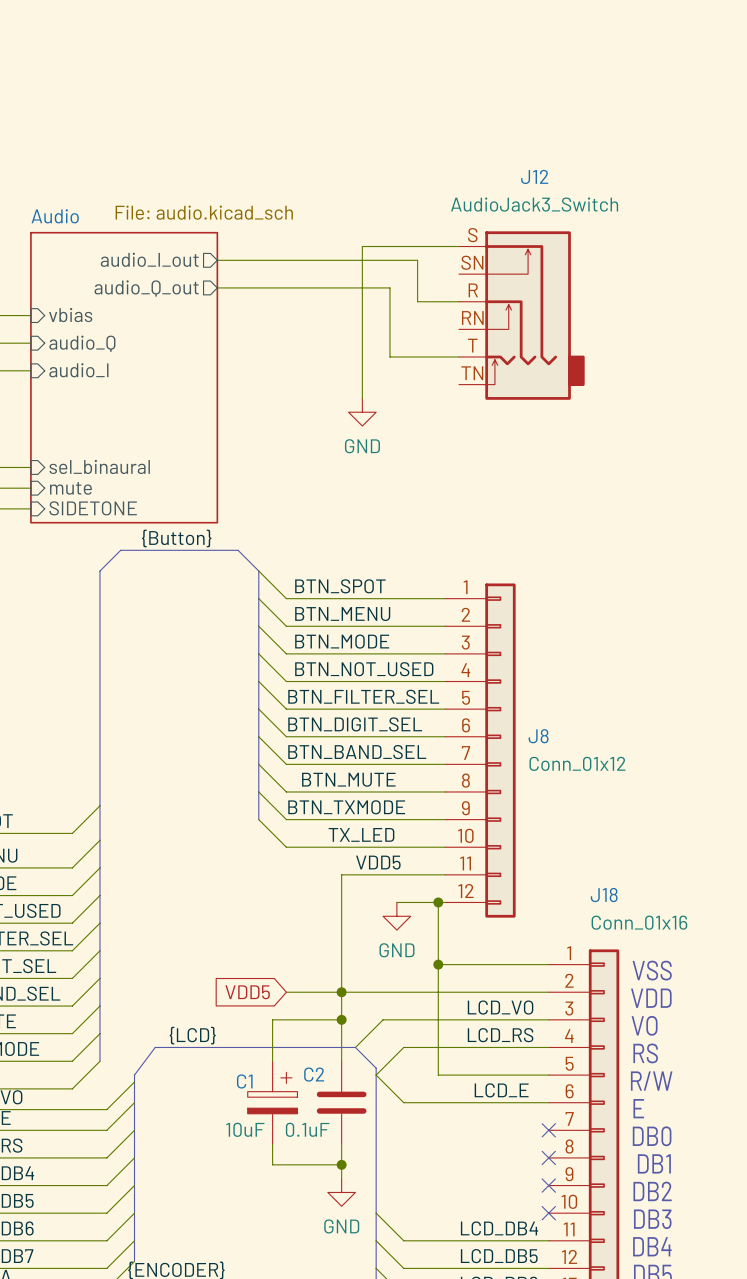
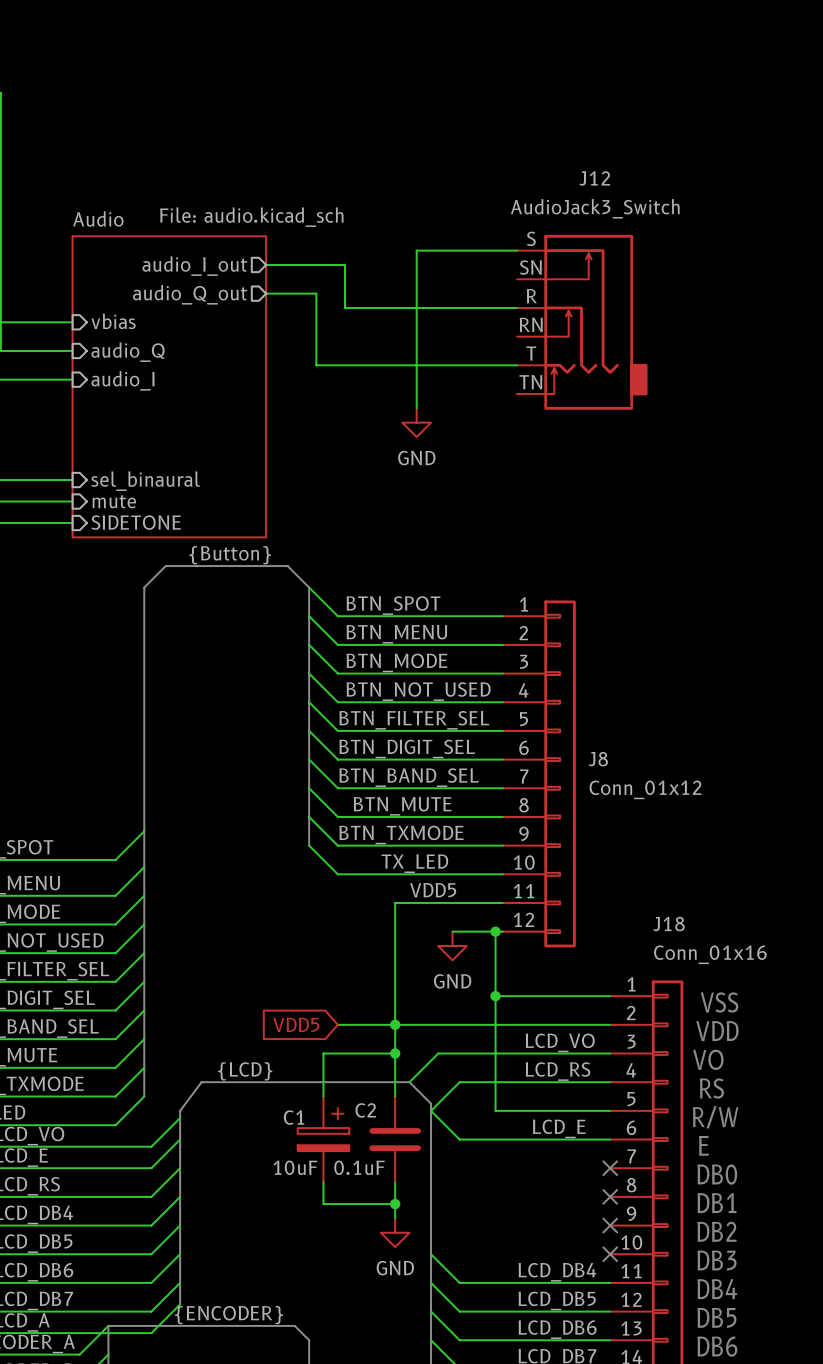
wire: (293, 260) (417, 260) (417, 301) -> (344, 264) (344, 307) (474, 307)
wire: (265, 287) (389, 287) (389, 356) -> (316, 293) (316, 365) (445, 365)

